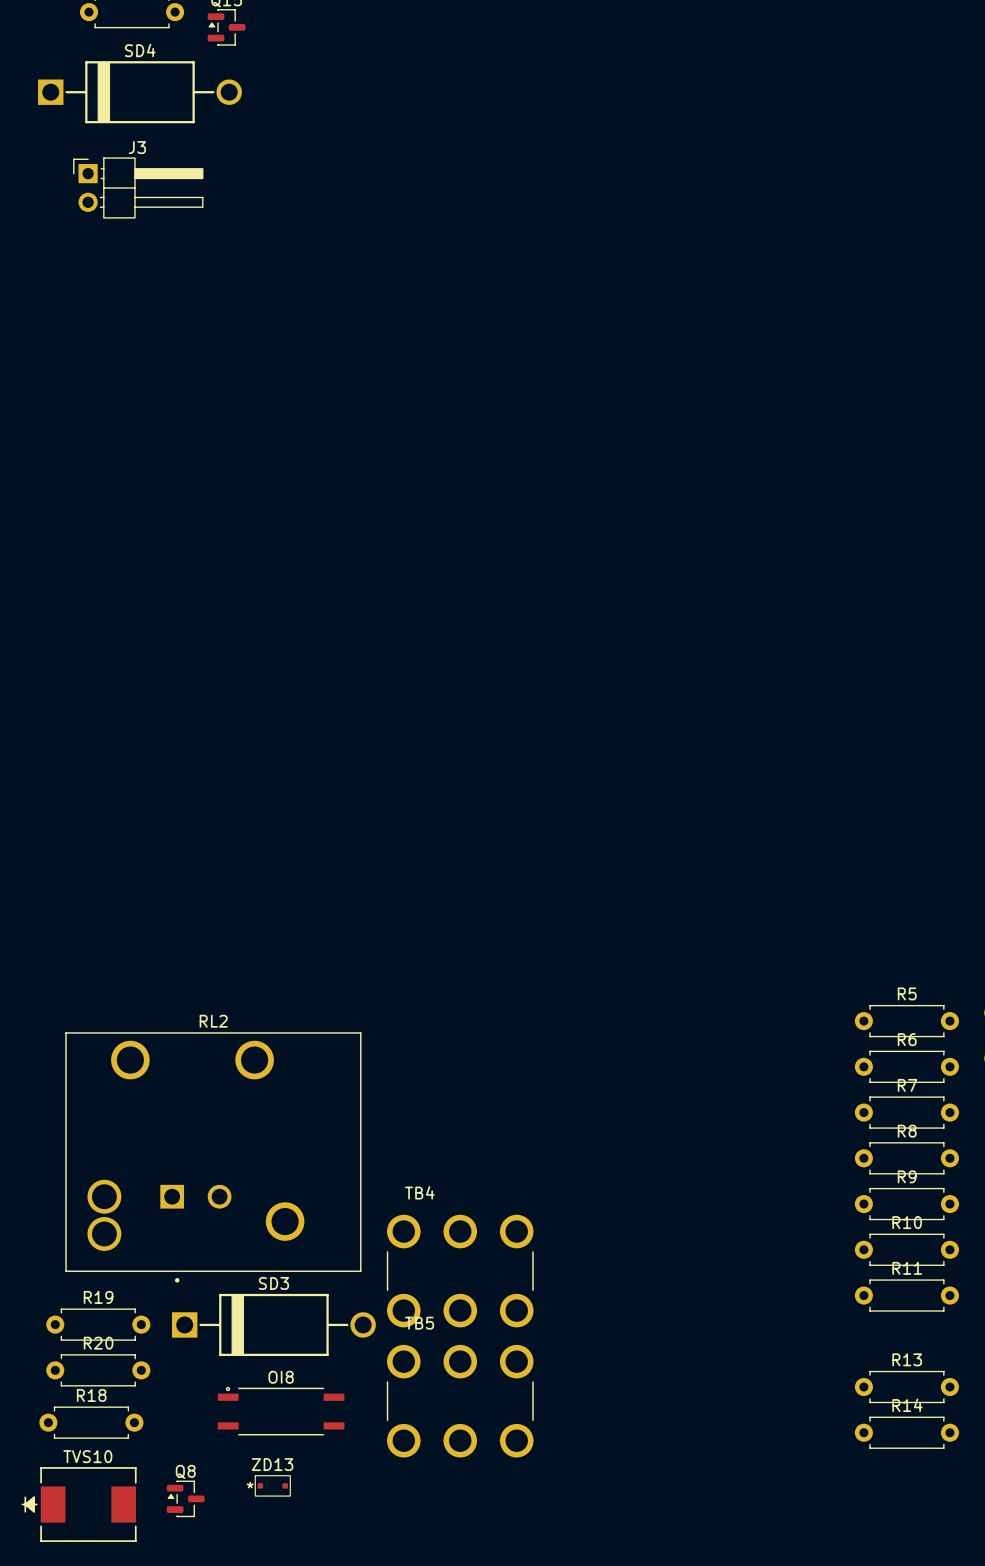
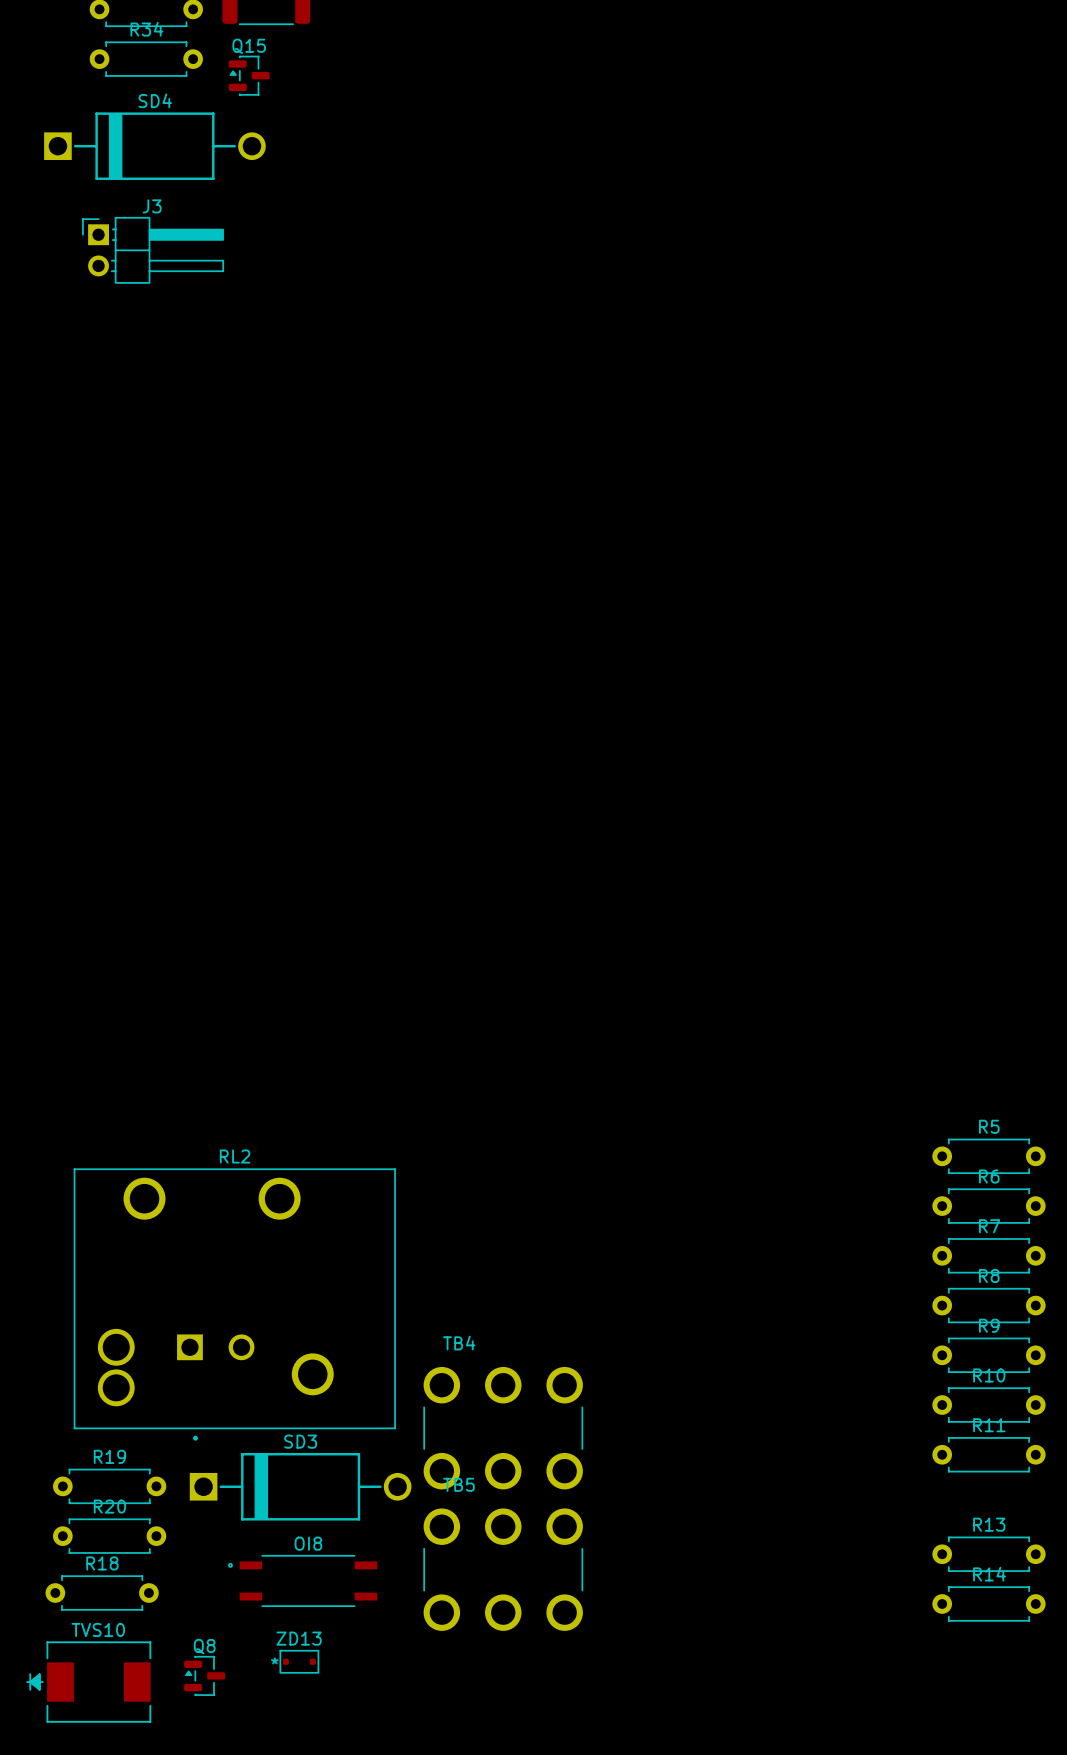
OI8 footprint: [217, 1386, 345, 1436] -> [228, 1555, 378, 1607]

